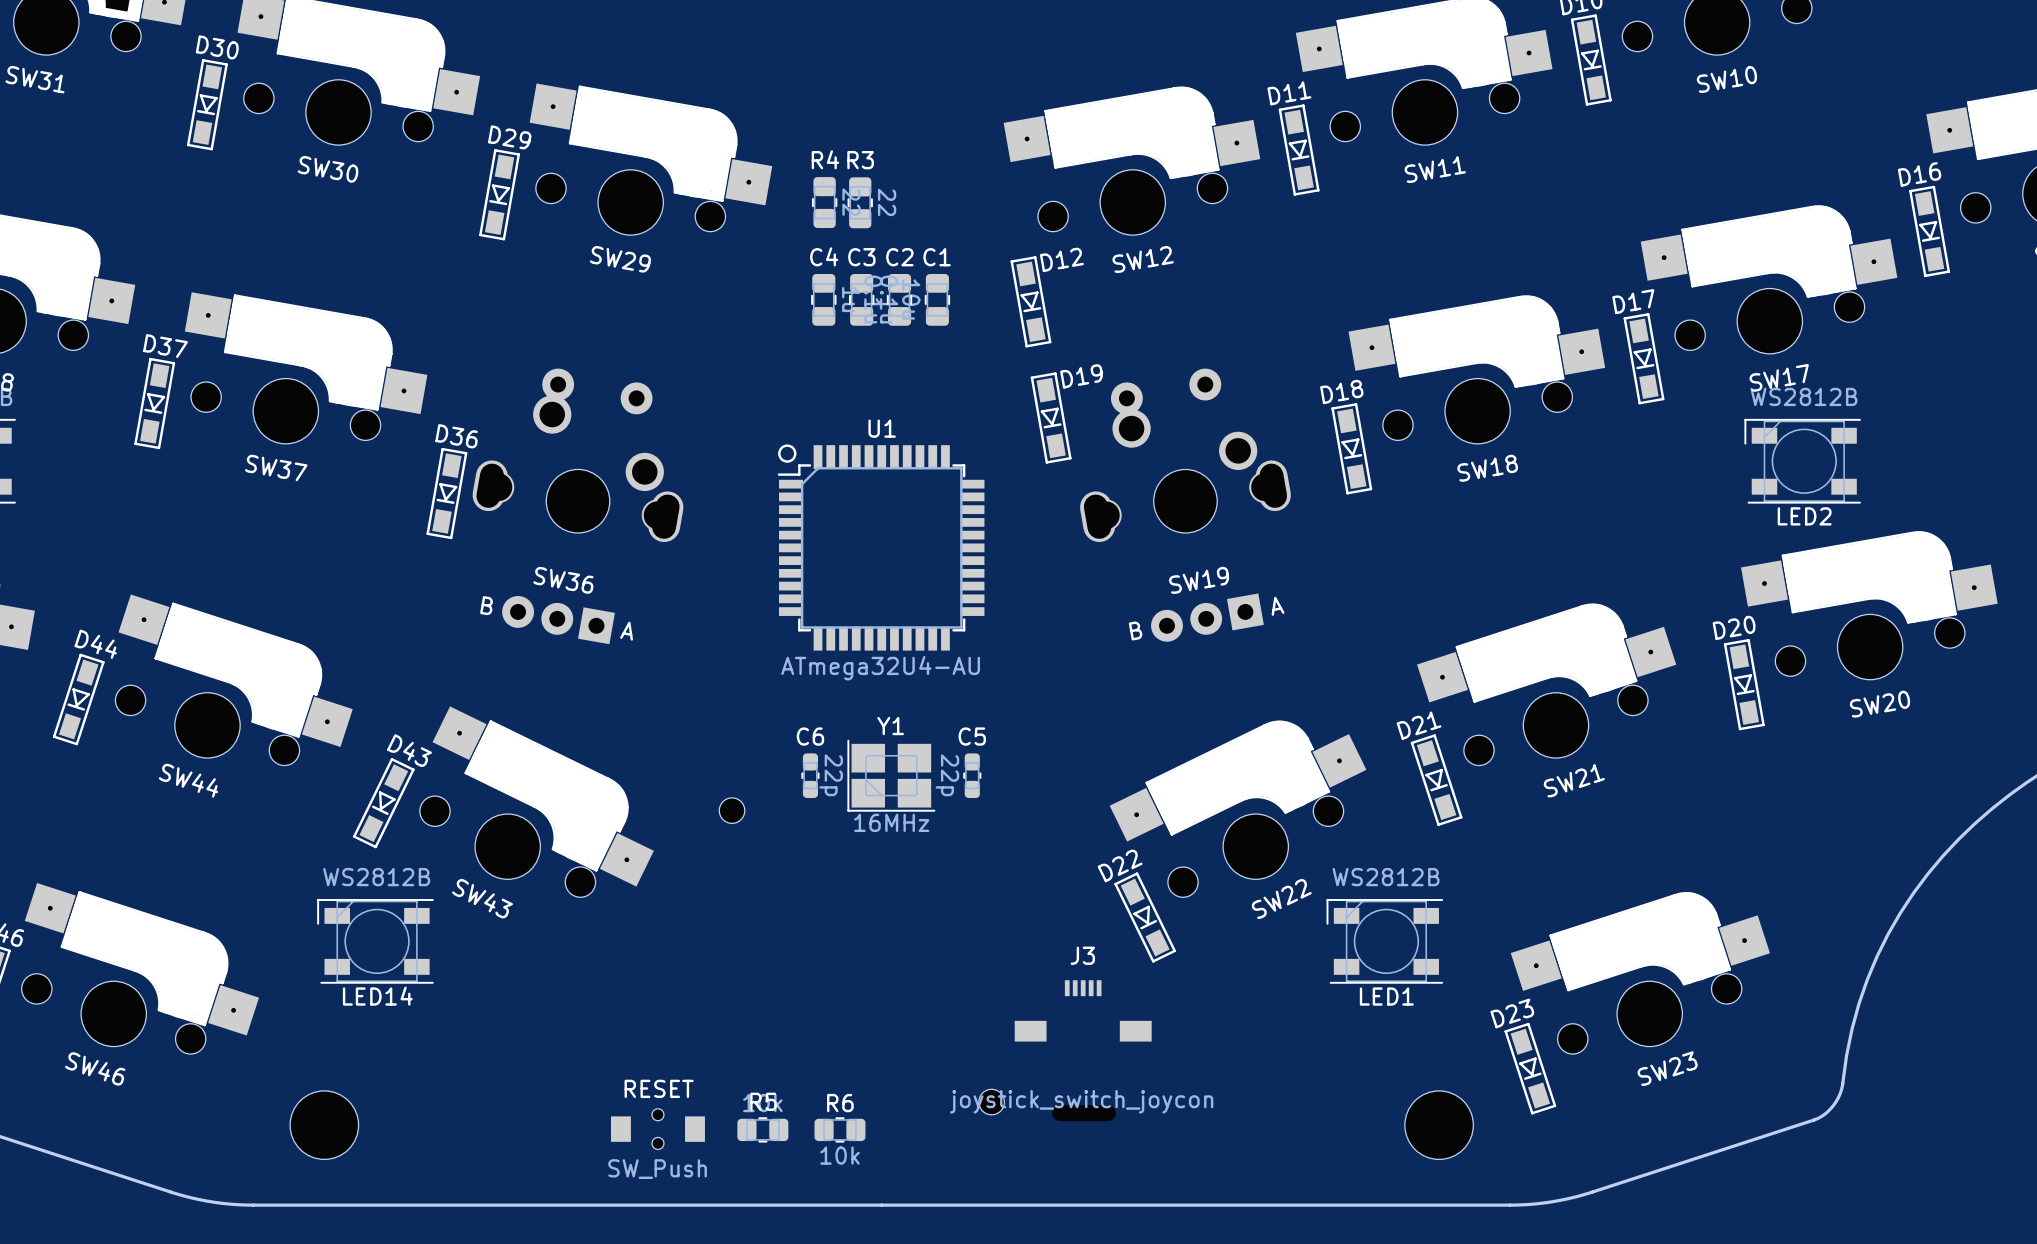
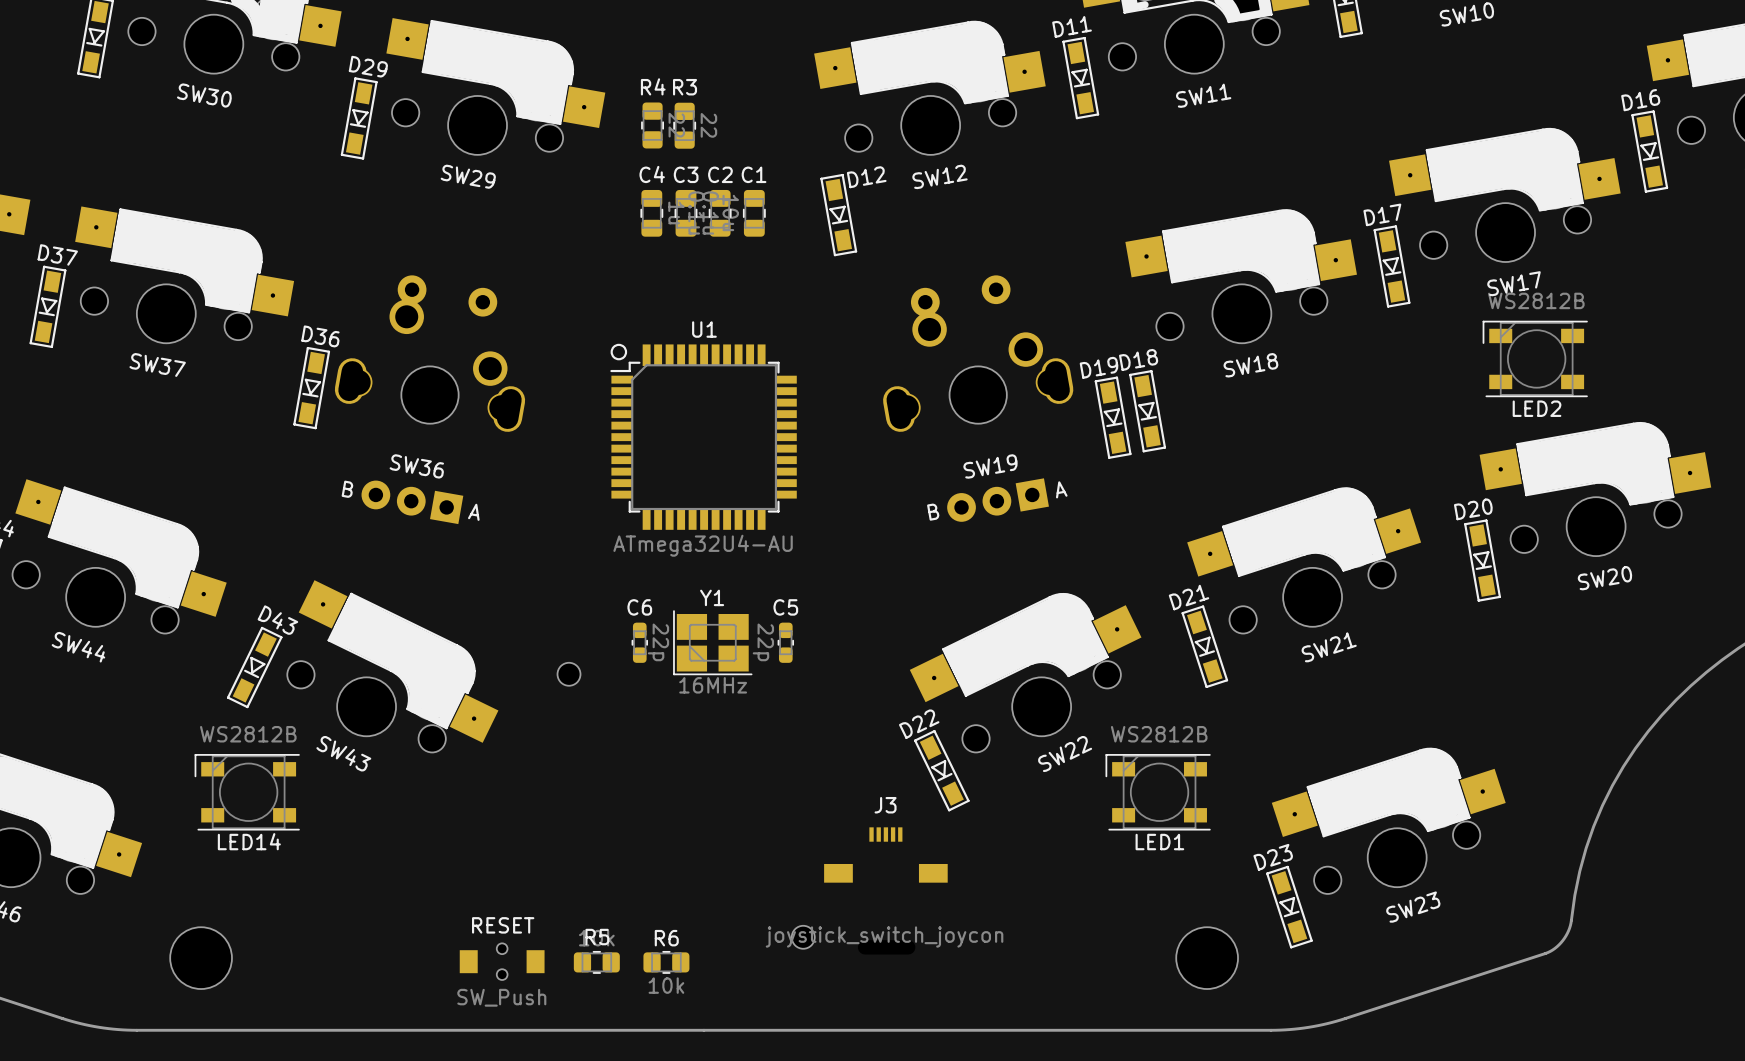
D19 name position: D19 (1081, 376) -> D19 (1099, 367)
D19 position: (1051, 417) -> (1113, 417)
D18 position: (1351, 448) -> (1147, 411)

